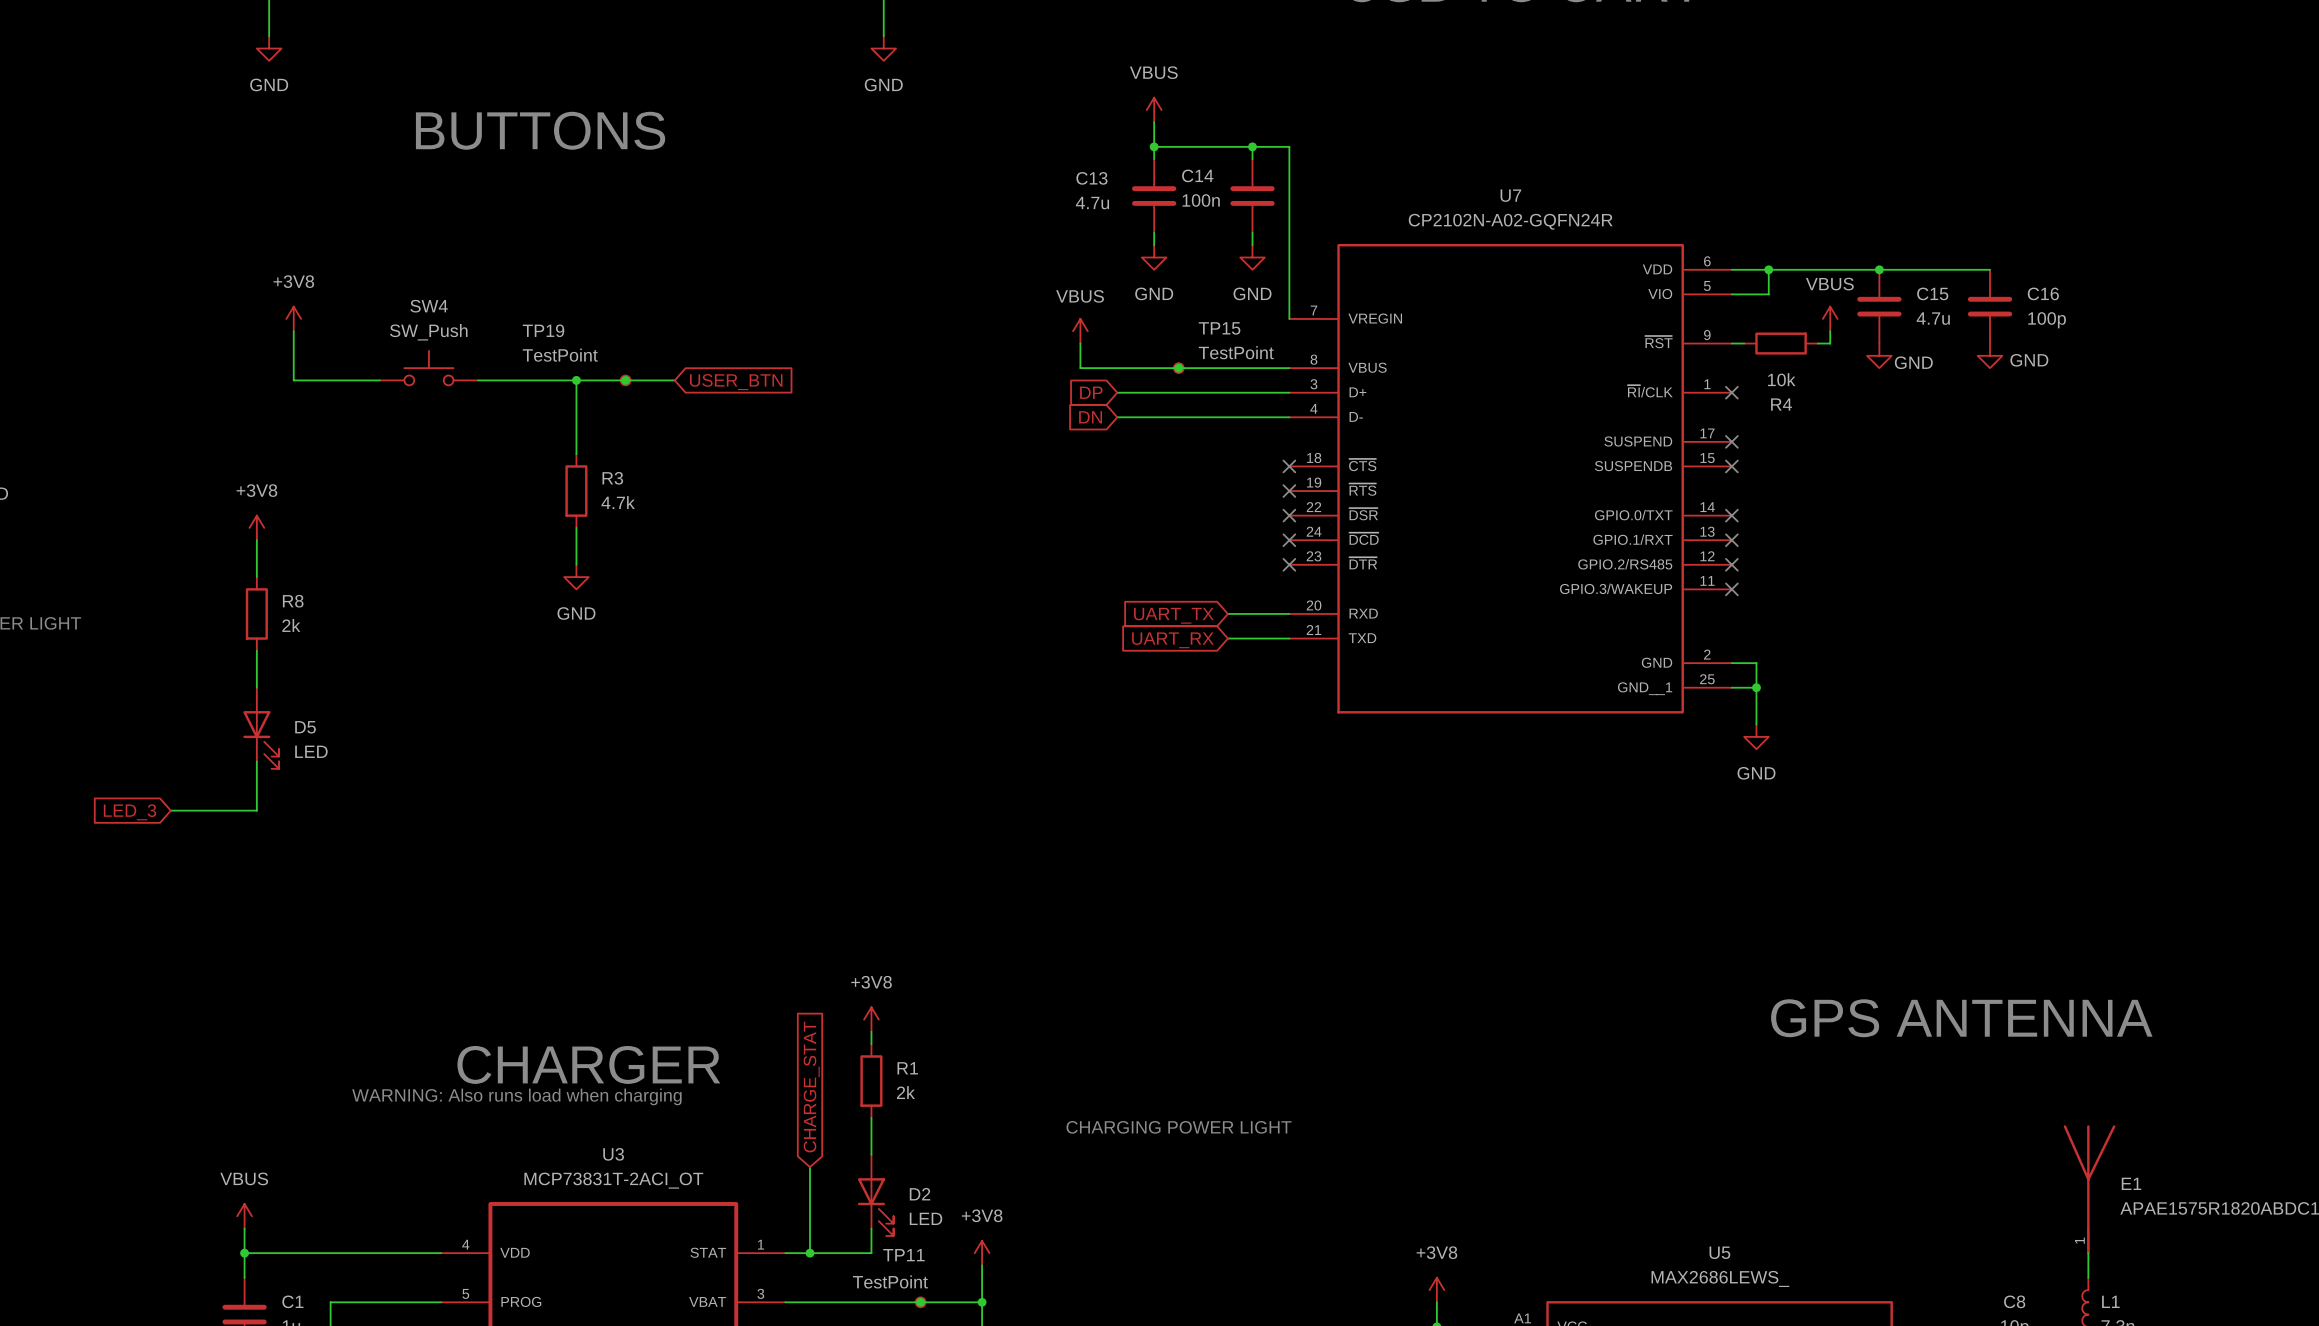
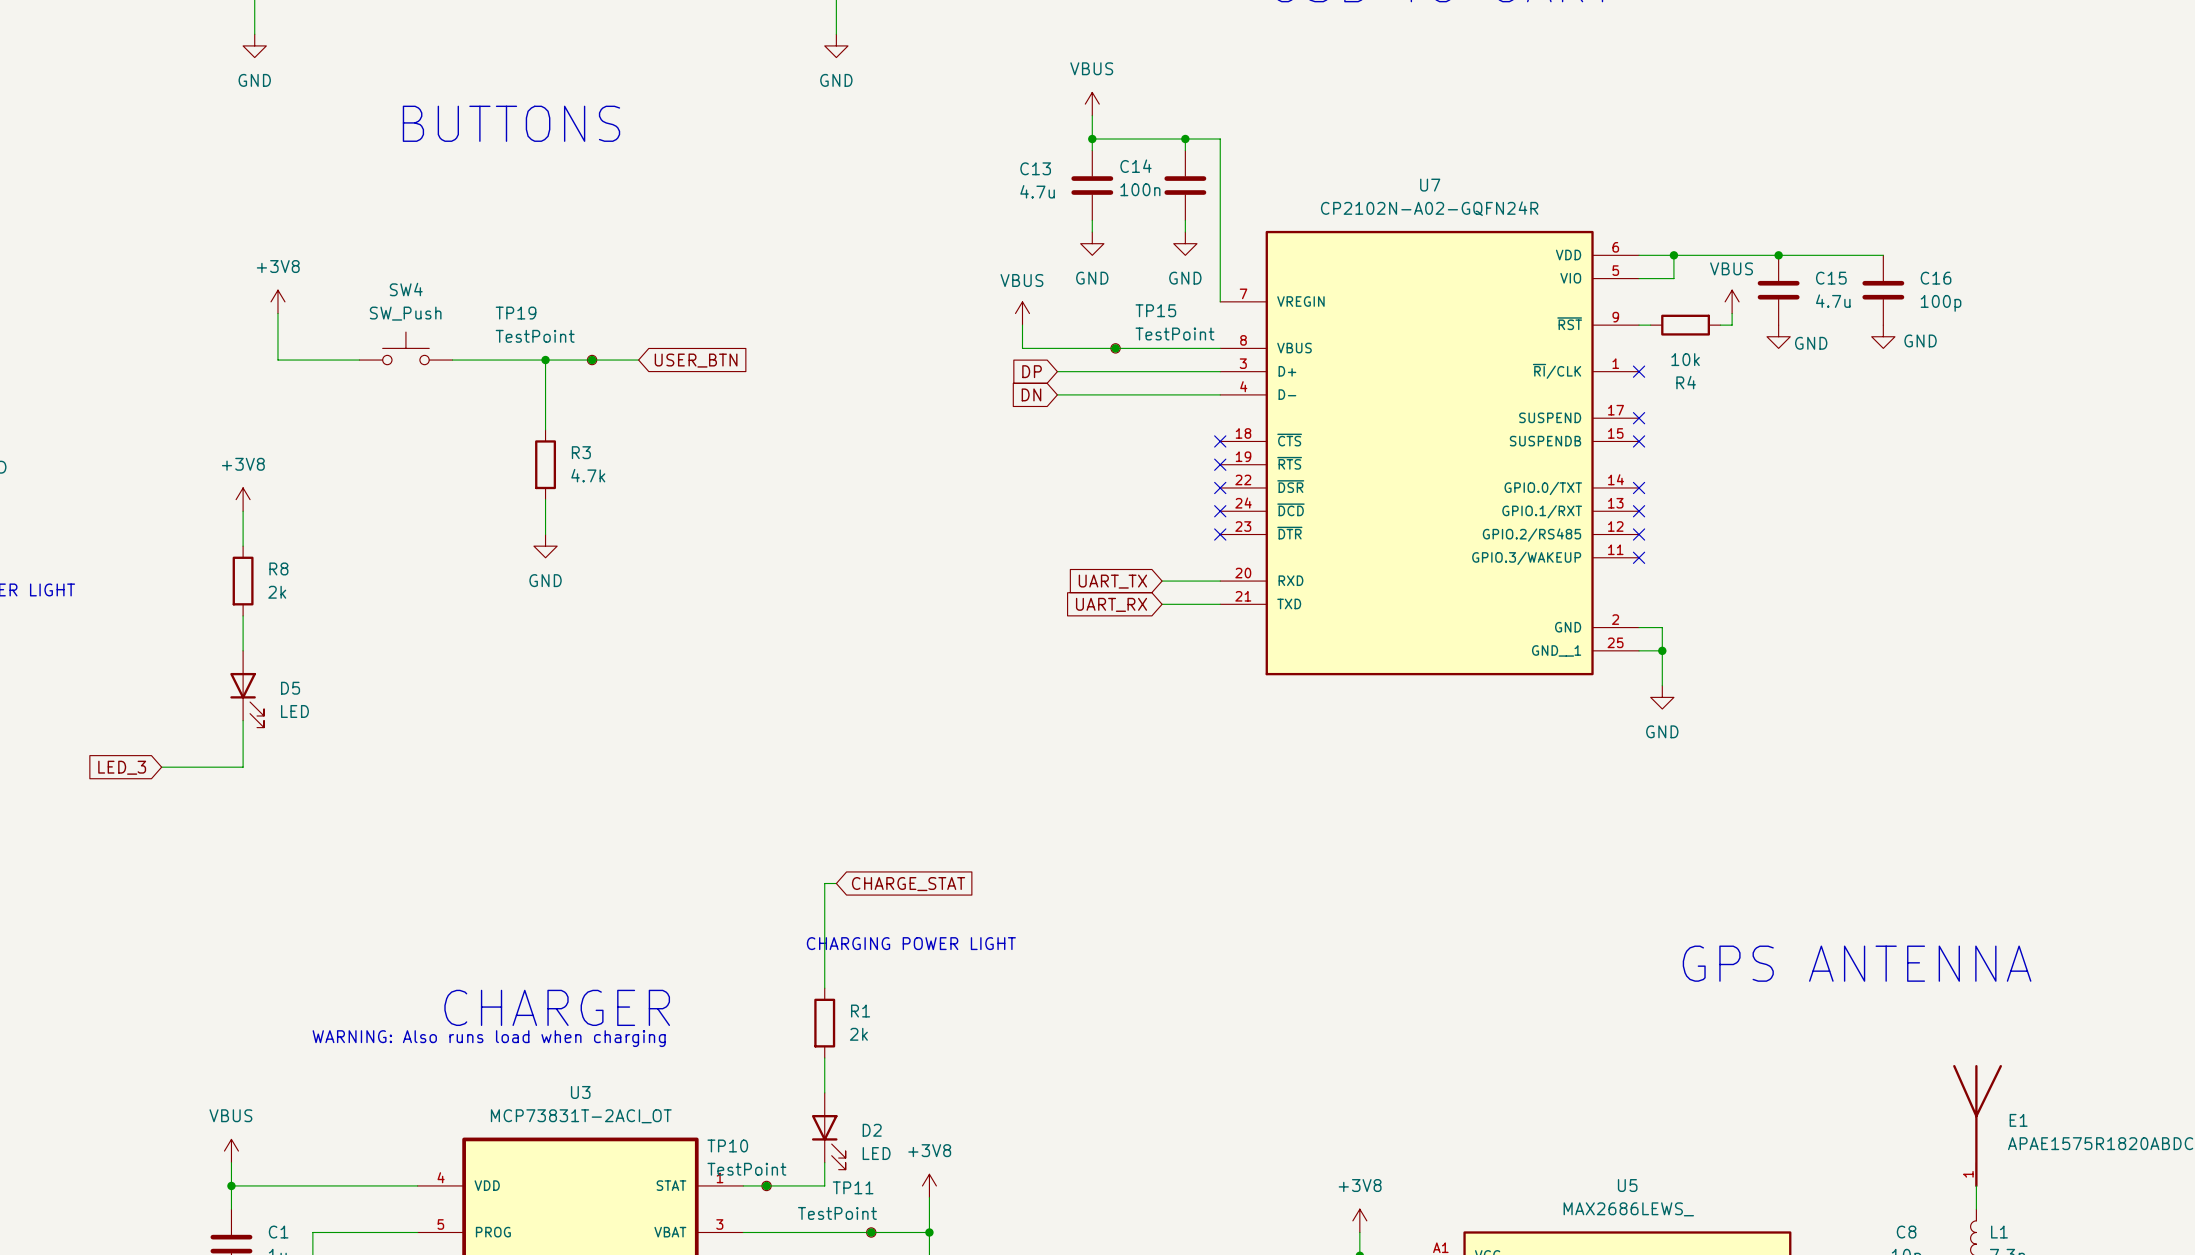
wire: none -> (836, 883) (824, 883) (824, 976)
global label: none -> CHARGE_STAT (908, 884)
text: none -> CHARGING POWER LIGHT (911, 943)
power symbol: +3V8 (871, 1019) -> none
global label: CHARGE_STAT (811, 1087) -> none
text: CHARGING POWER LIGHT (1179, 1127) -> none
wire: (809, 1167) (809, 1253) -> none
TP10: none -> TestPoint (766, 1185)

